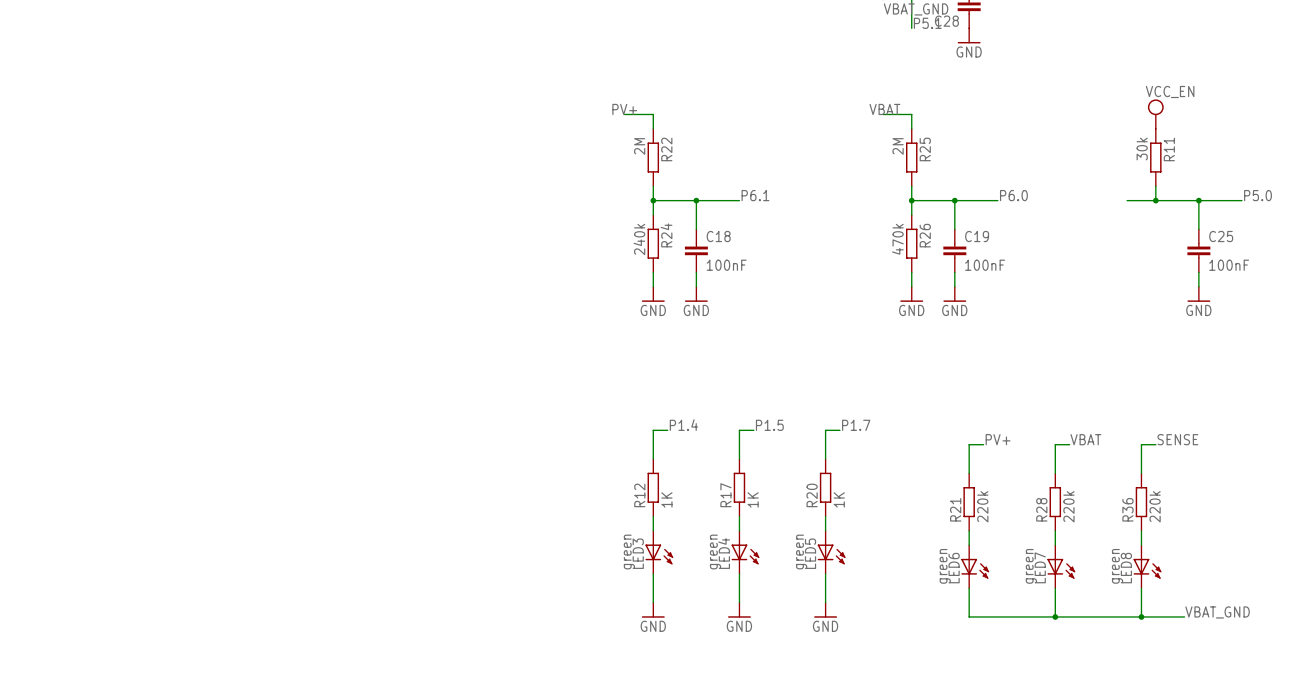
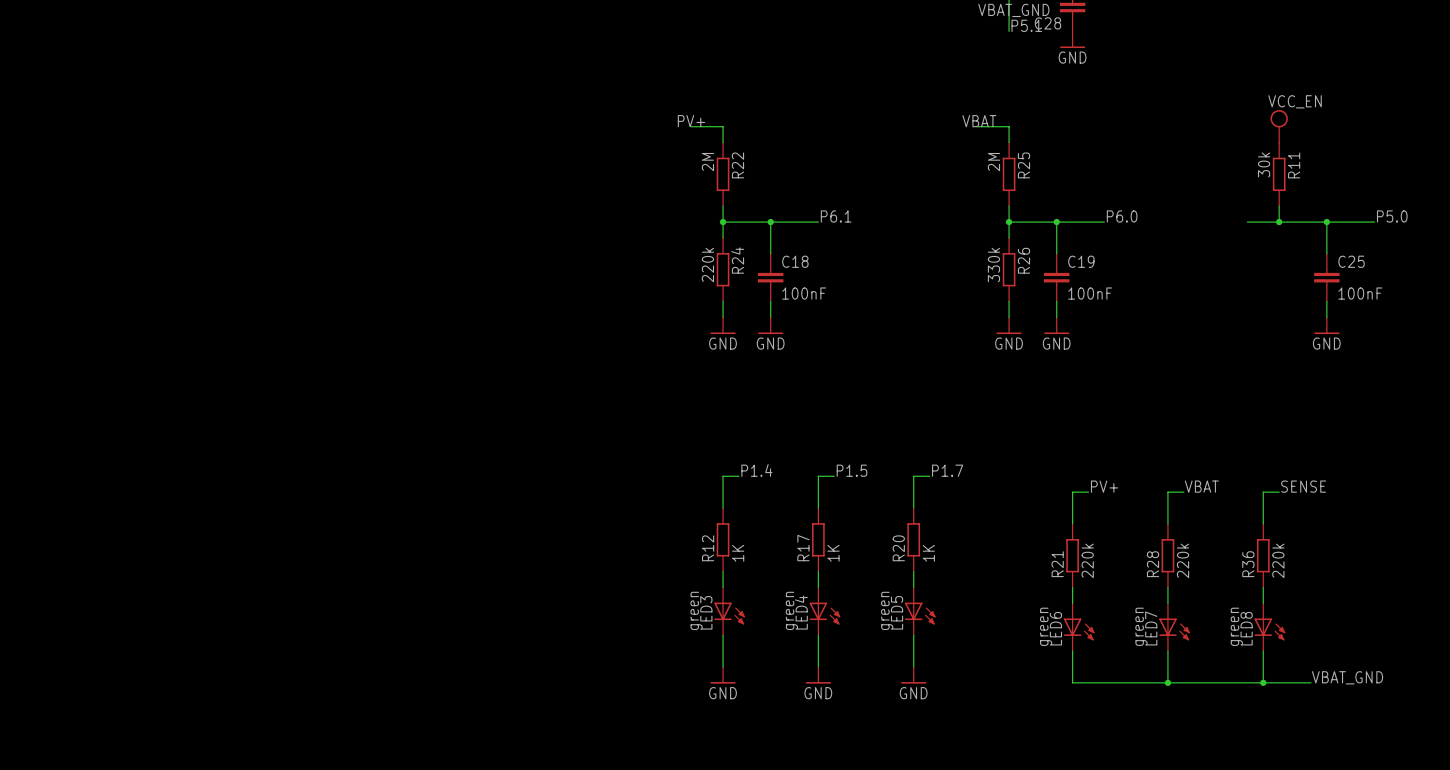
R24 value: 240k (639, 239) -> 220k (707, 265)
R26 value: 470k (897, 239) -> 330k (993, 265)

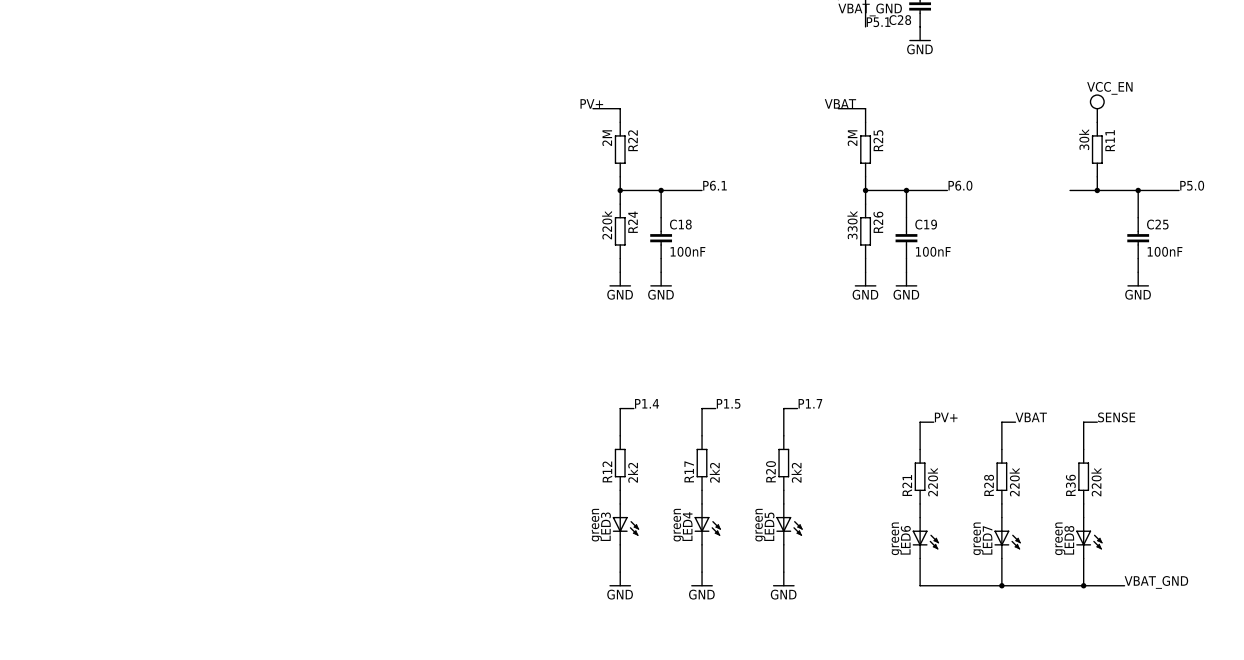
R12 value: 1K (738, 553) -> 2k2 (632, 472)
R17 value: 1K (833, 553) -> 2k2 (714, 472)
R20 value: 1K (928, 553) -> 2k2 (796, 472)

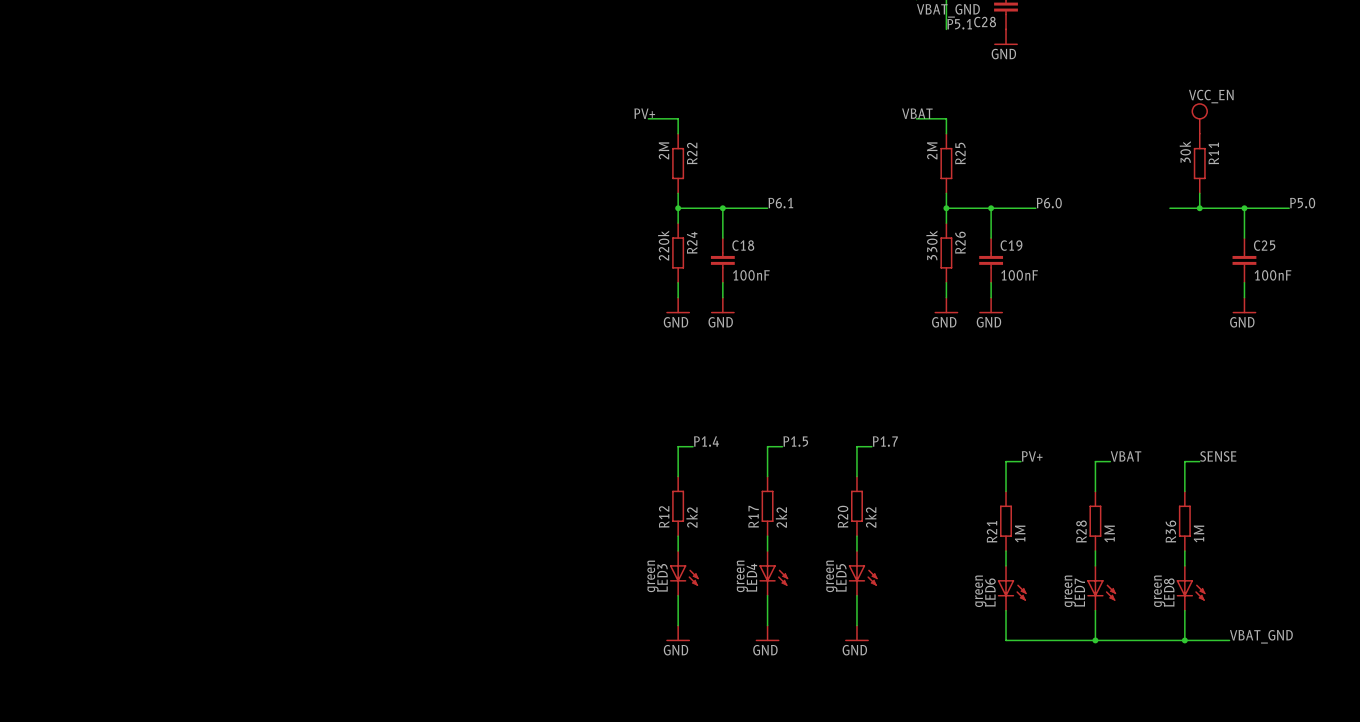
R21 value: 220k (932, 482) -> 1M (1020, 533)
R28 value: 220k (1014, 482) -> 1M (1109, 533)
R36 value: 220k (1096, 482) -> 1M (1199, 533)

